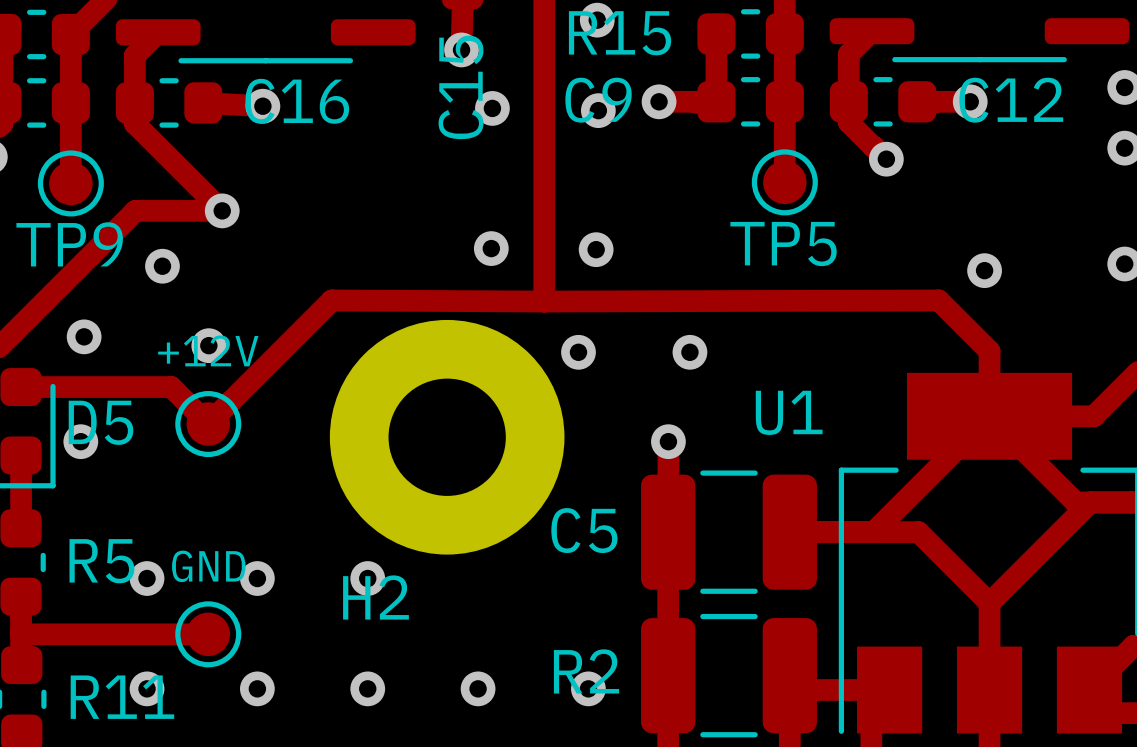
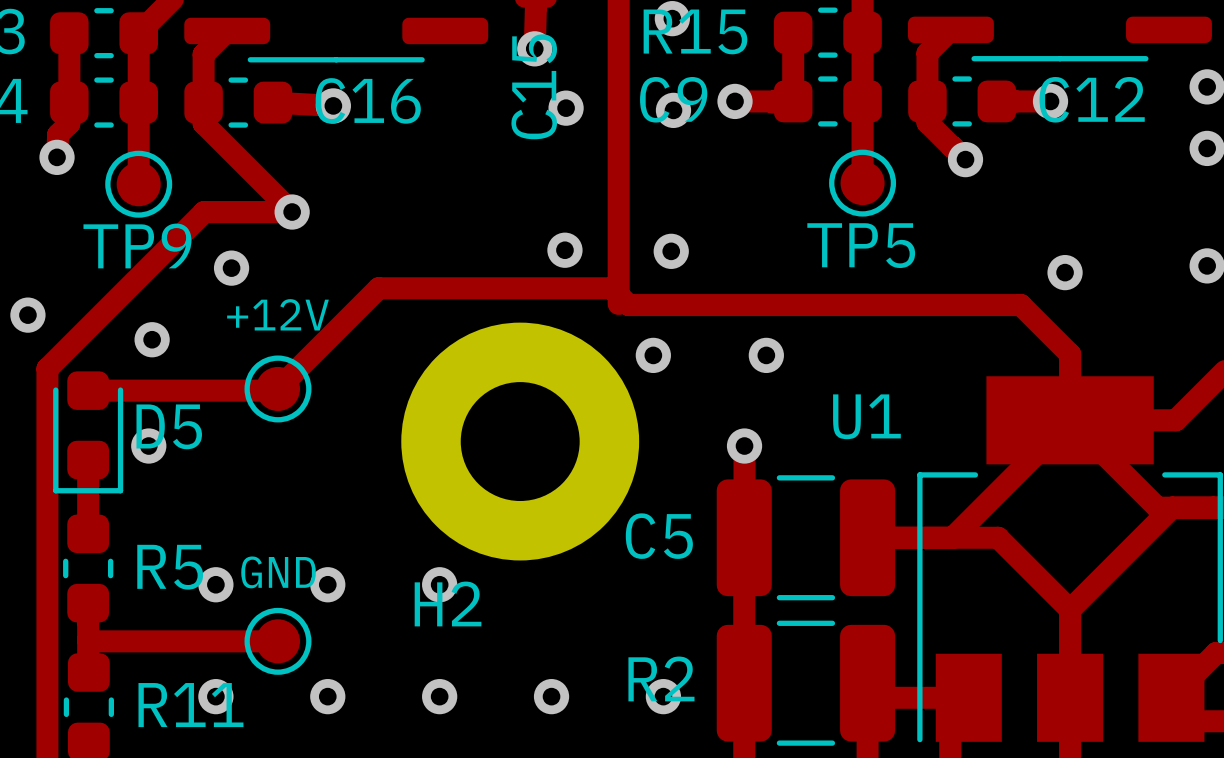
track: (941, 302) (938, 300) (331, 300) (208, 424) (171, 387) -> (1020, 305) (628, 305) (611, 288) (378, 288) (276, 390) (240, 390)
via: (208, 345) -> none
+12V position: (208, 424) -> (277, 388)

